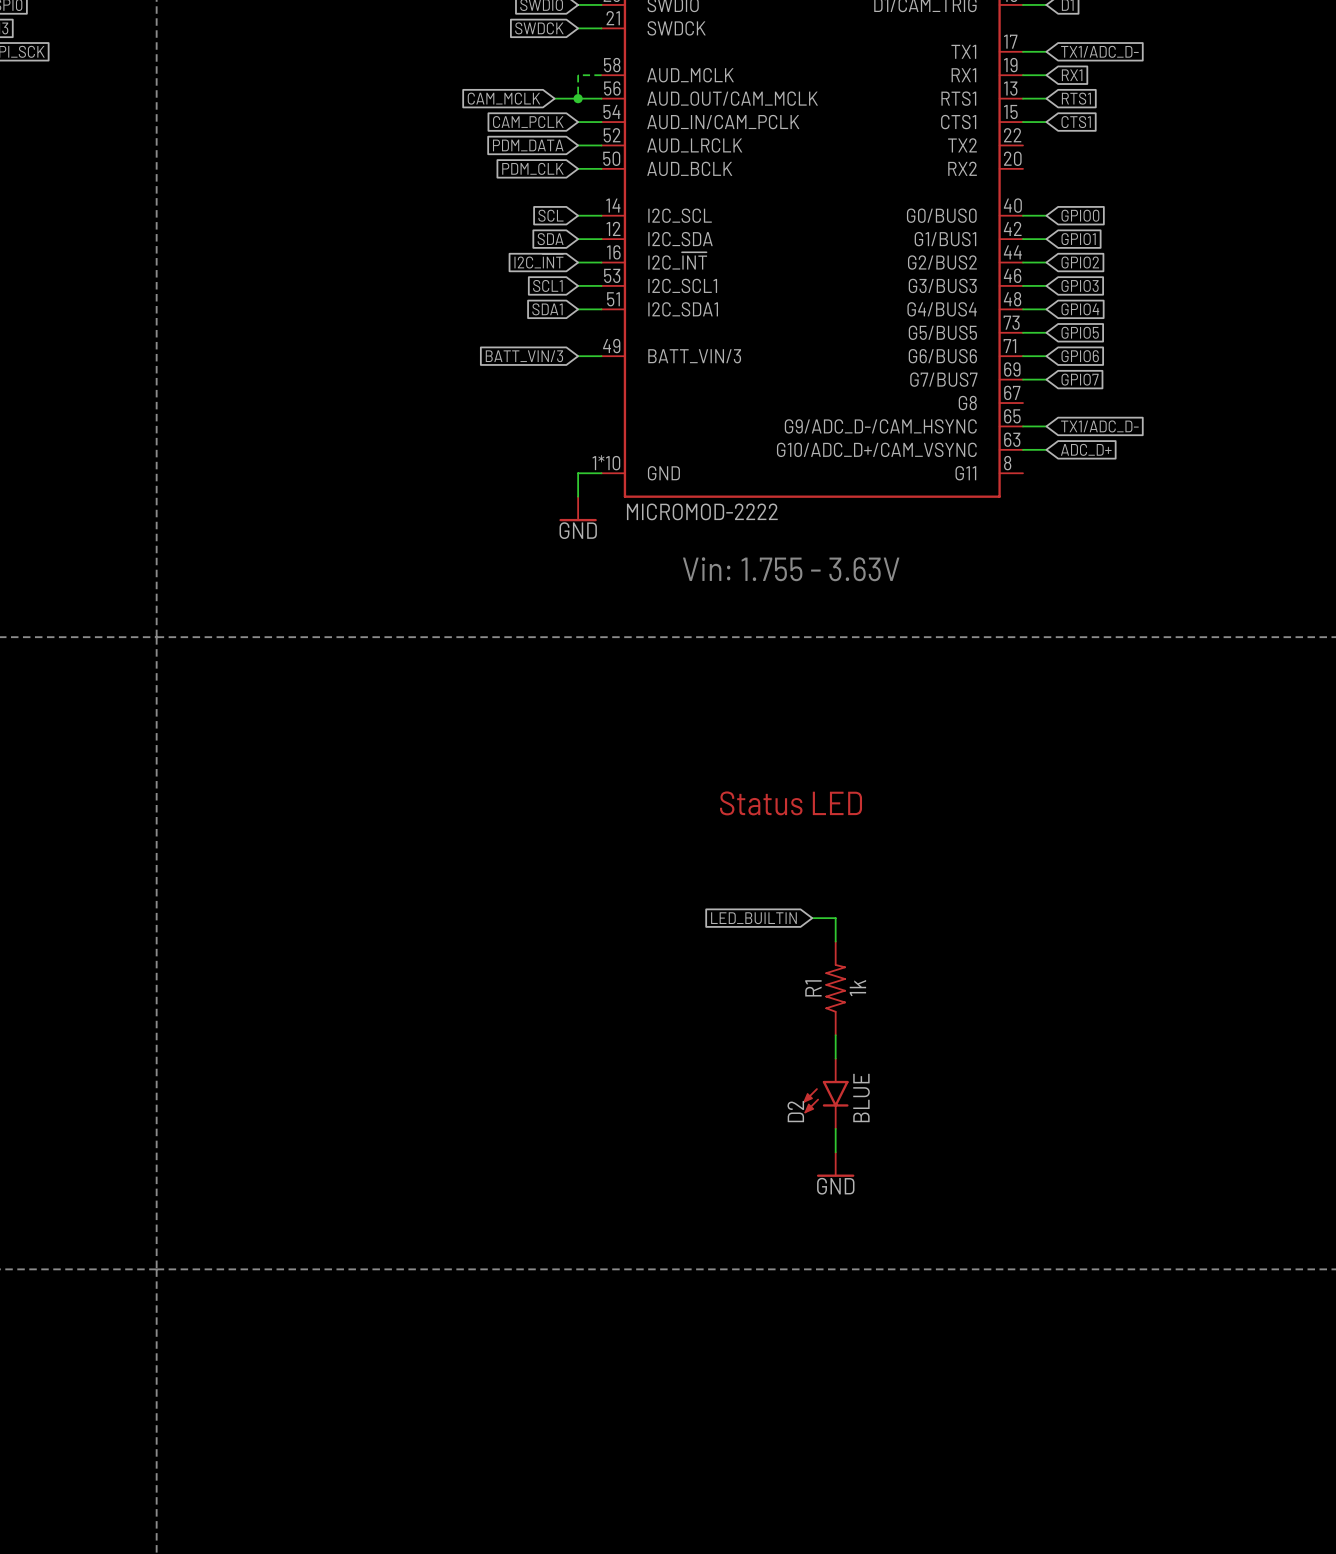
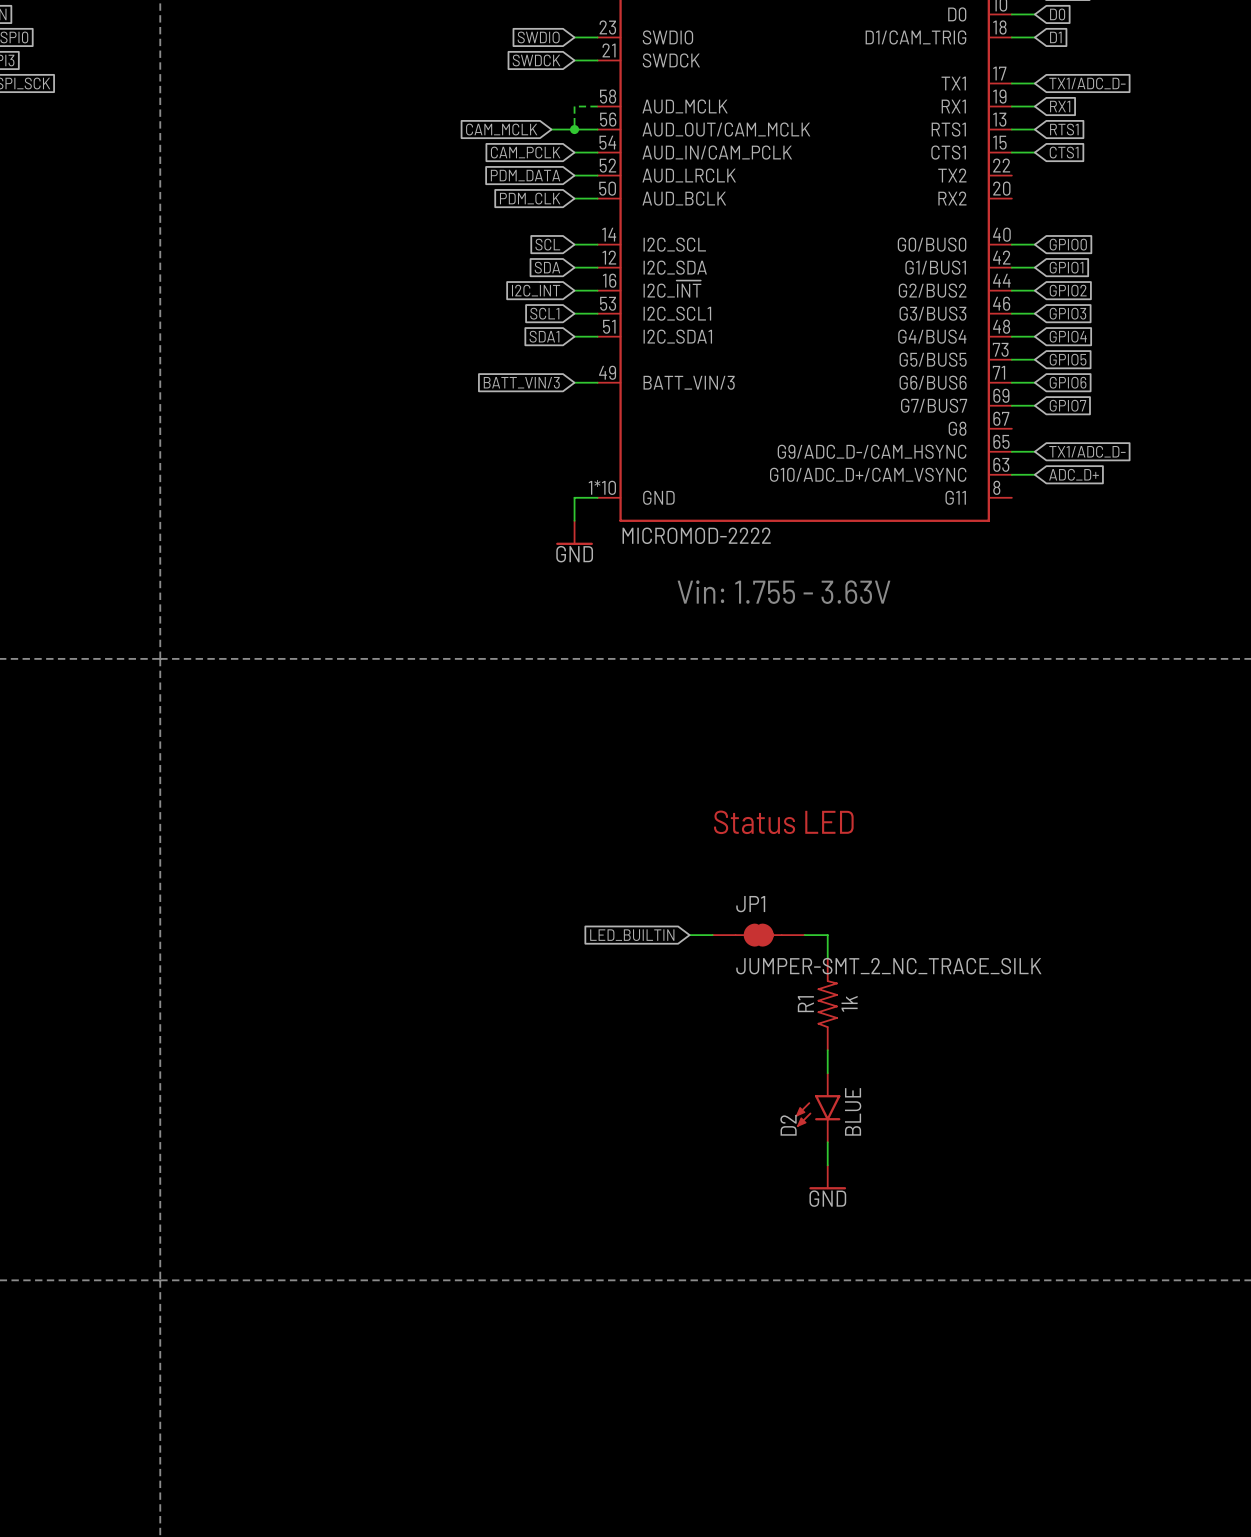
wire: none -> (689, 935) (712, 935)
global label position: LED_BUILTIN (753, 918) -> LED_BUILTIN (632, 935)
JP1: none -> JUMPER-SMT_2_NC_TRACE_SILK (758, 935)

